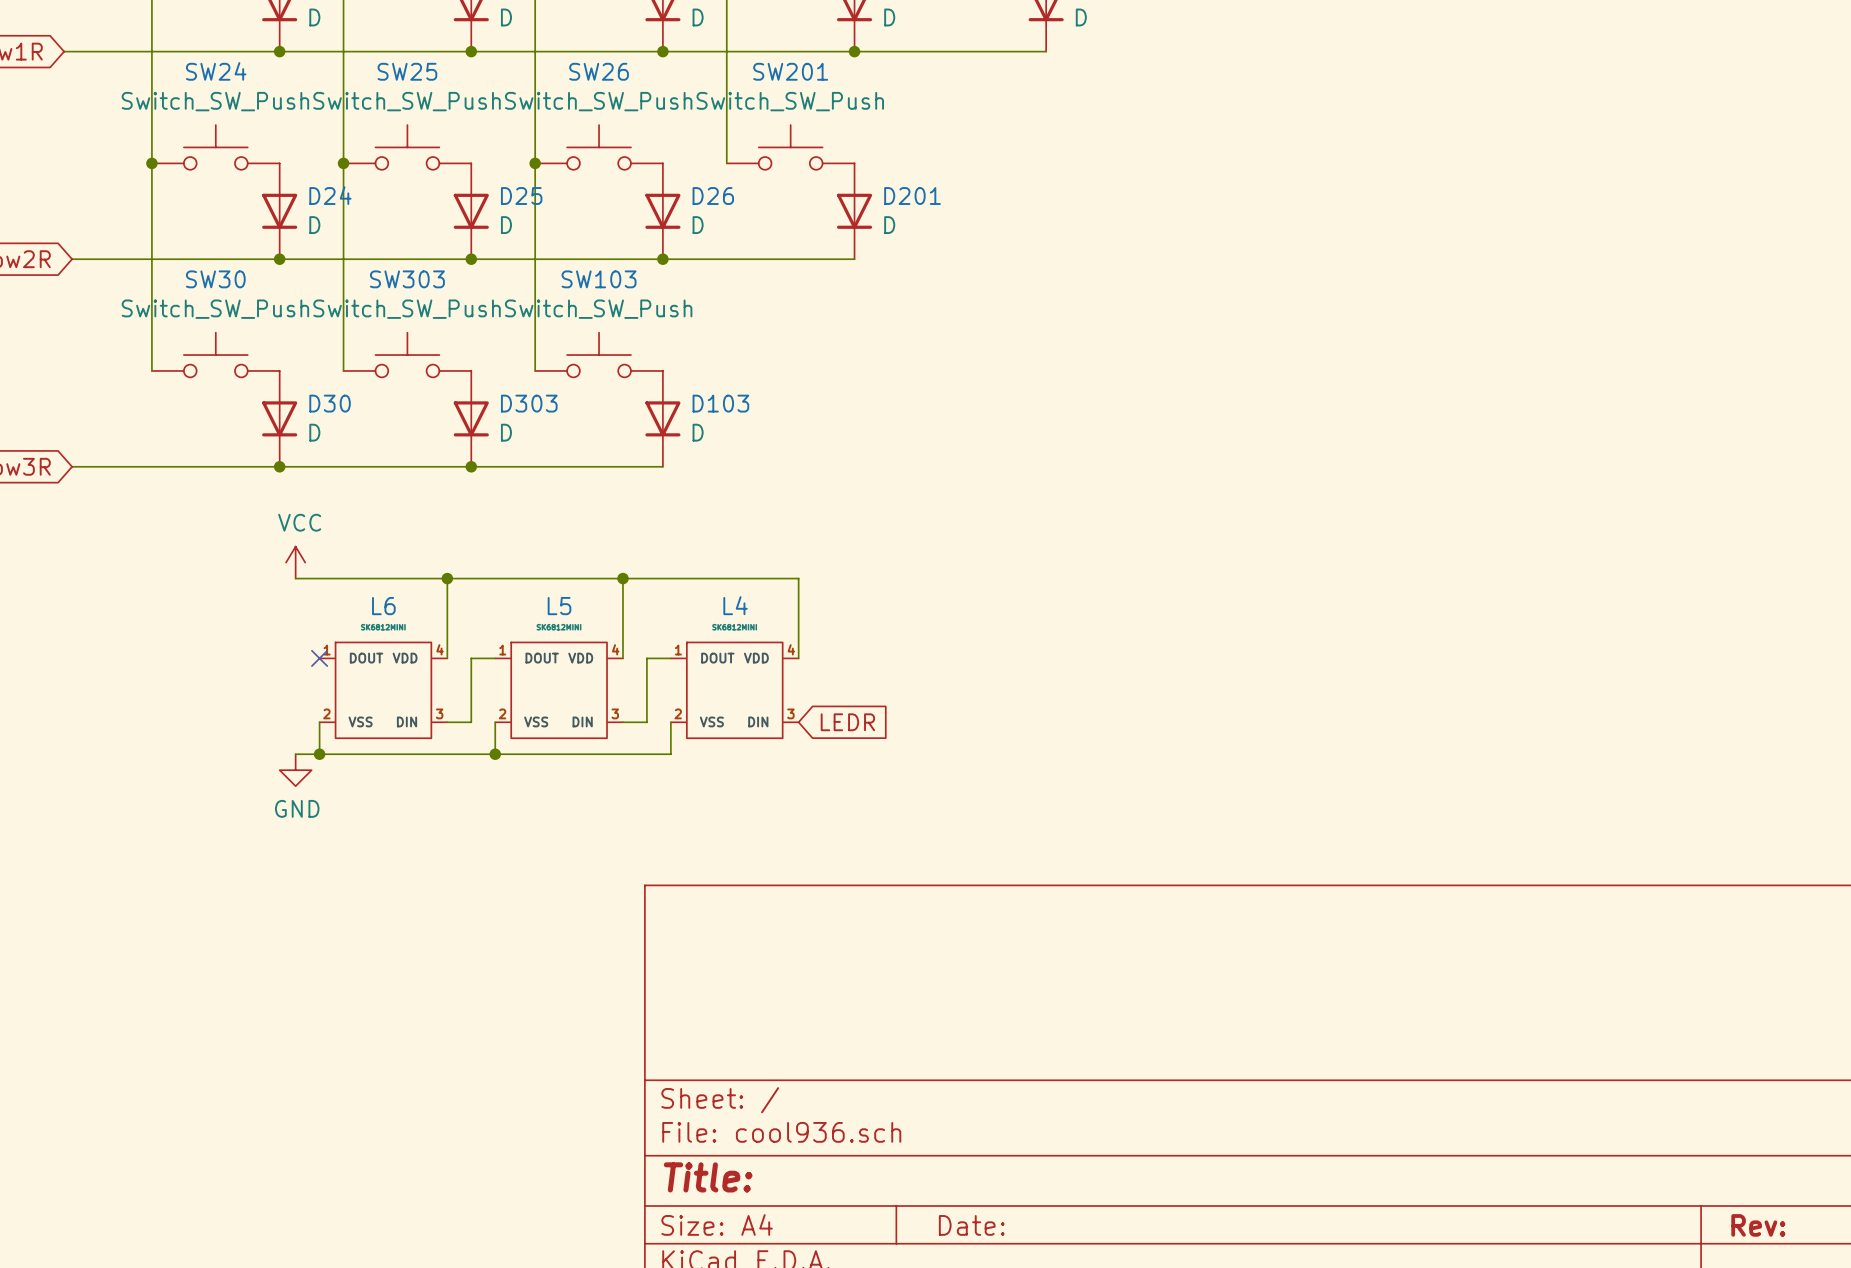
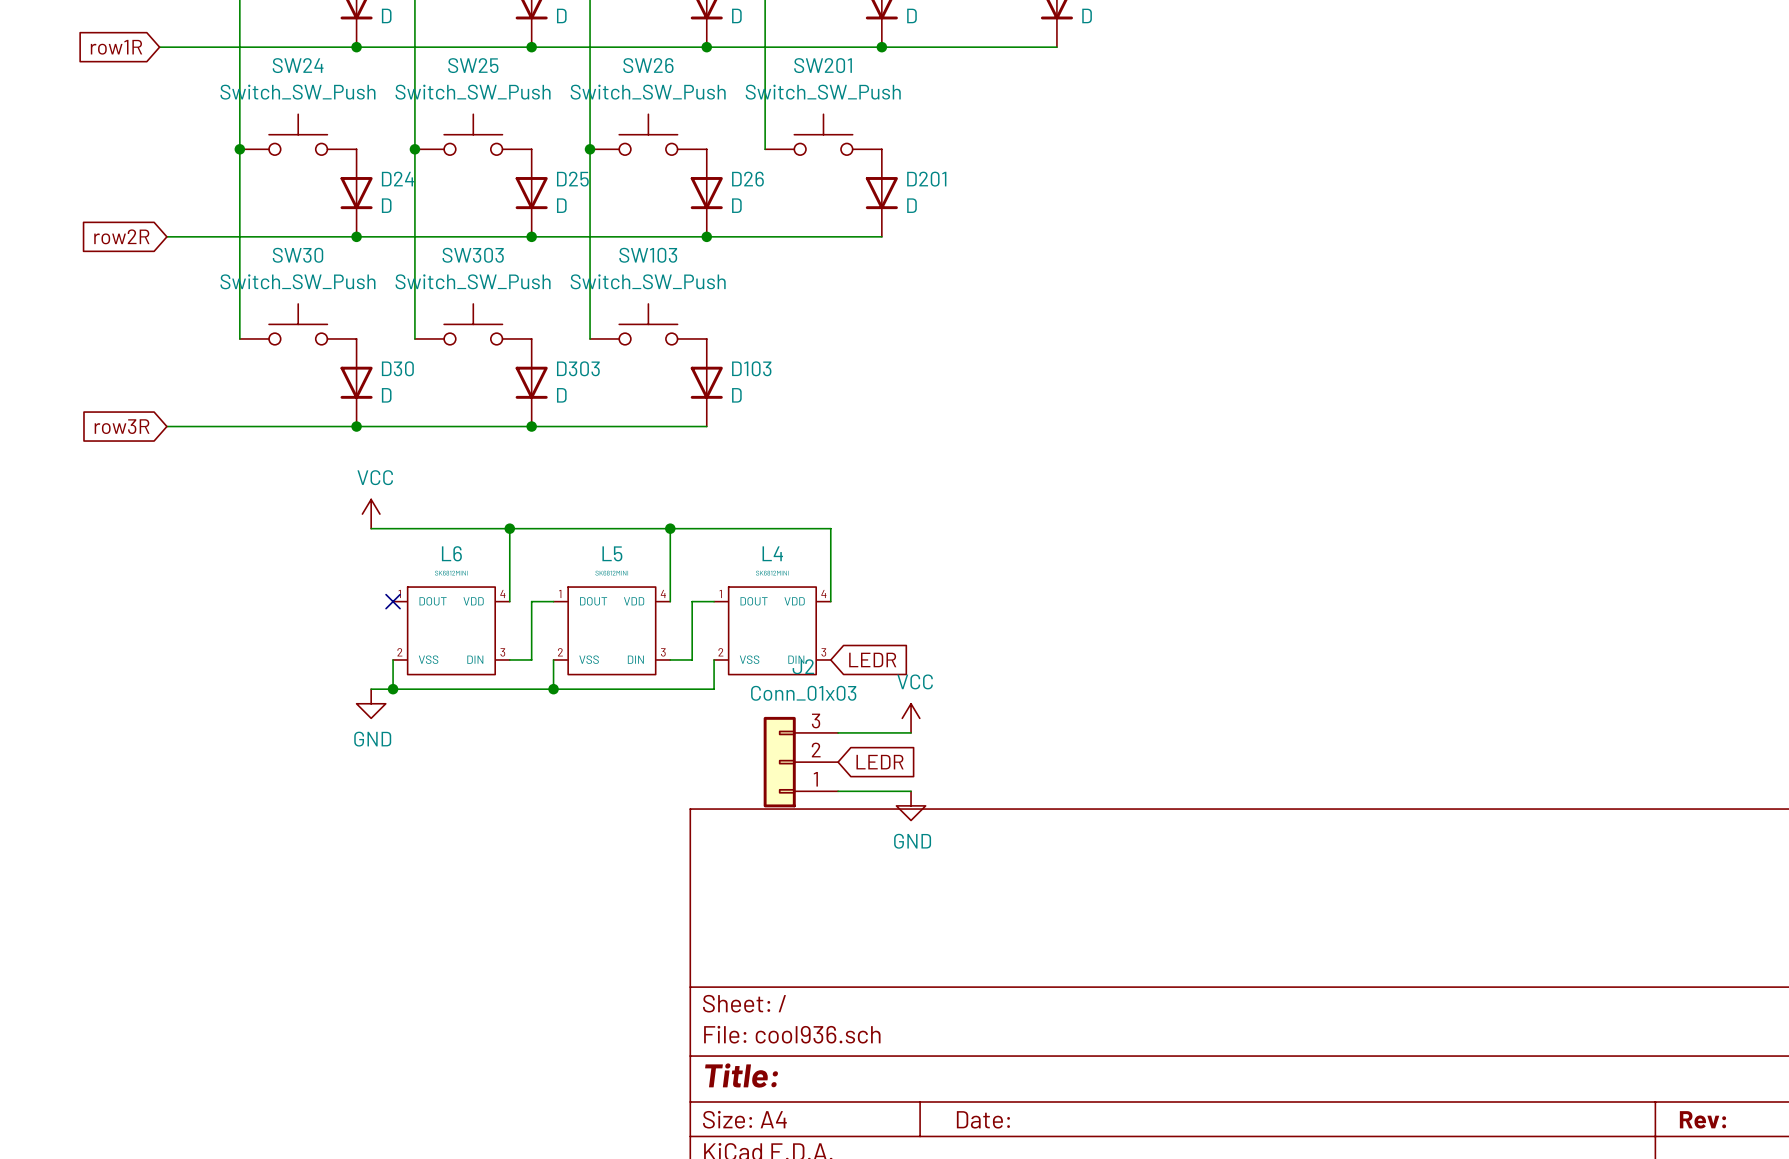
power symbol: none -> VCC (911, 718)
wire: none -> (838, 732) (911, 732)
J2: none -> Conn_01x03 (800, 762)
global label: none -> LEDR (880, 762)
wire: none -> (838, 791) (911, 791)
power symbol: none -> GND (911, 805)

